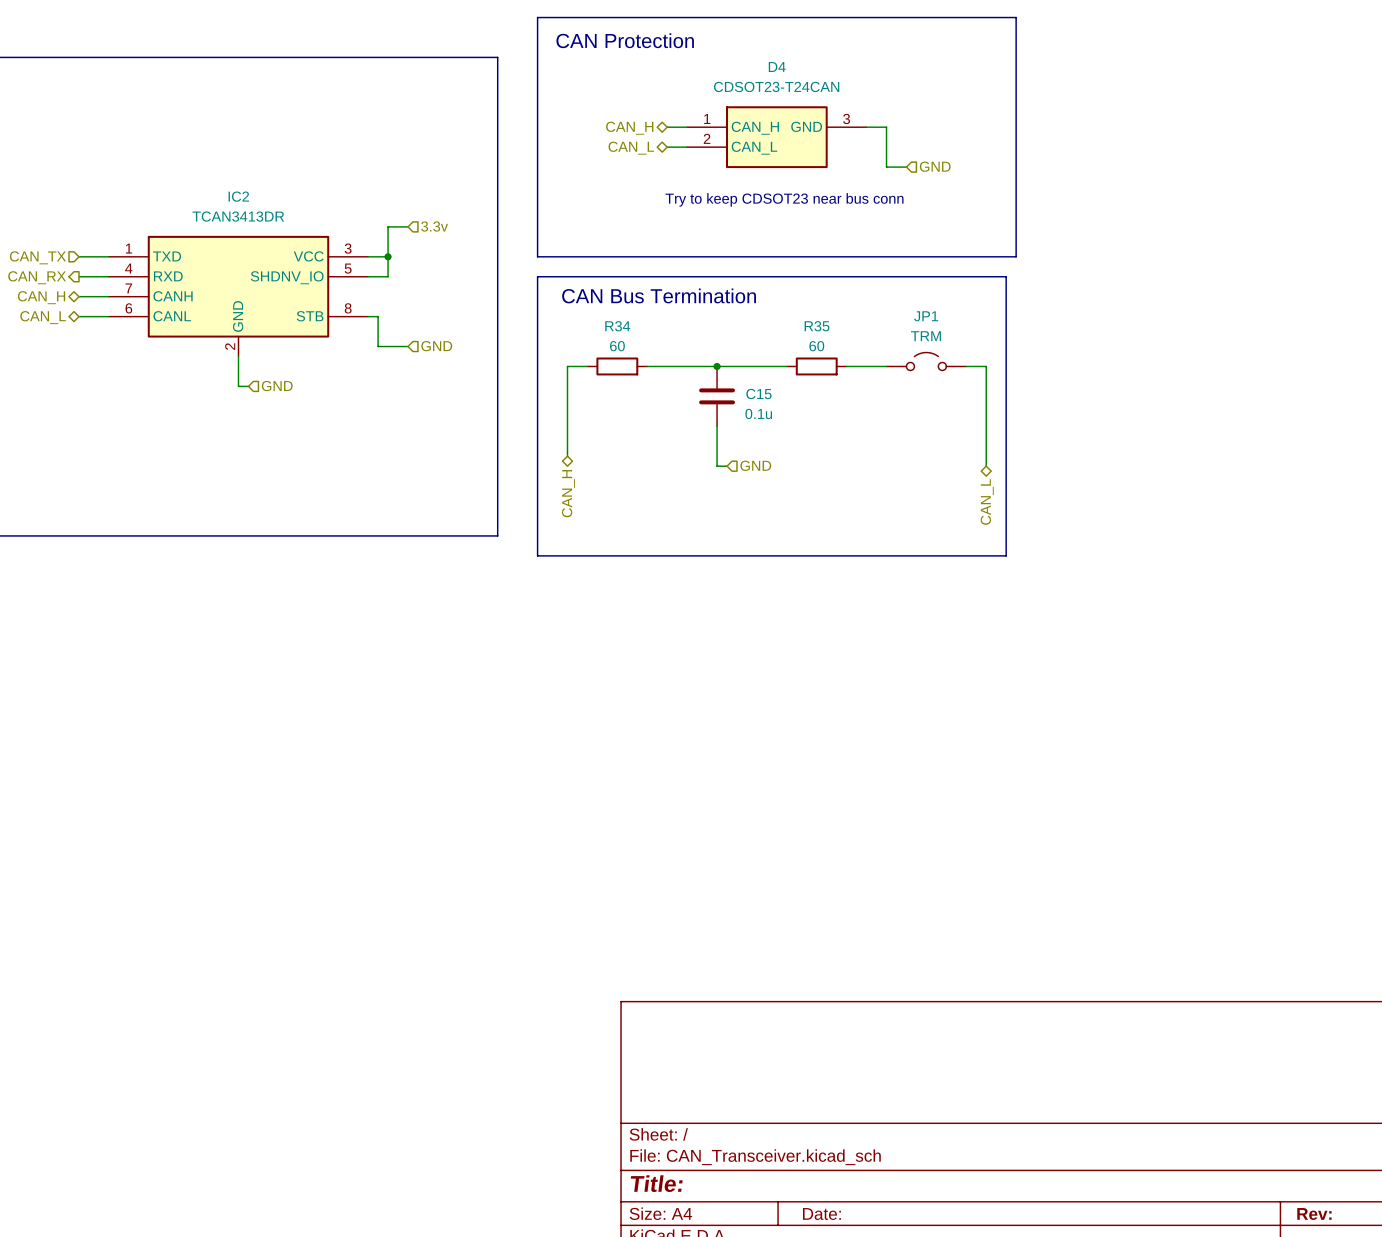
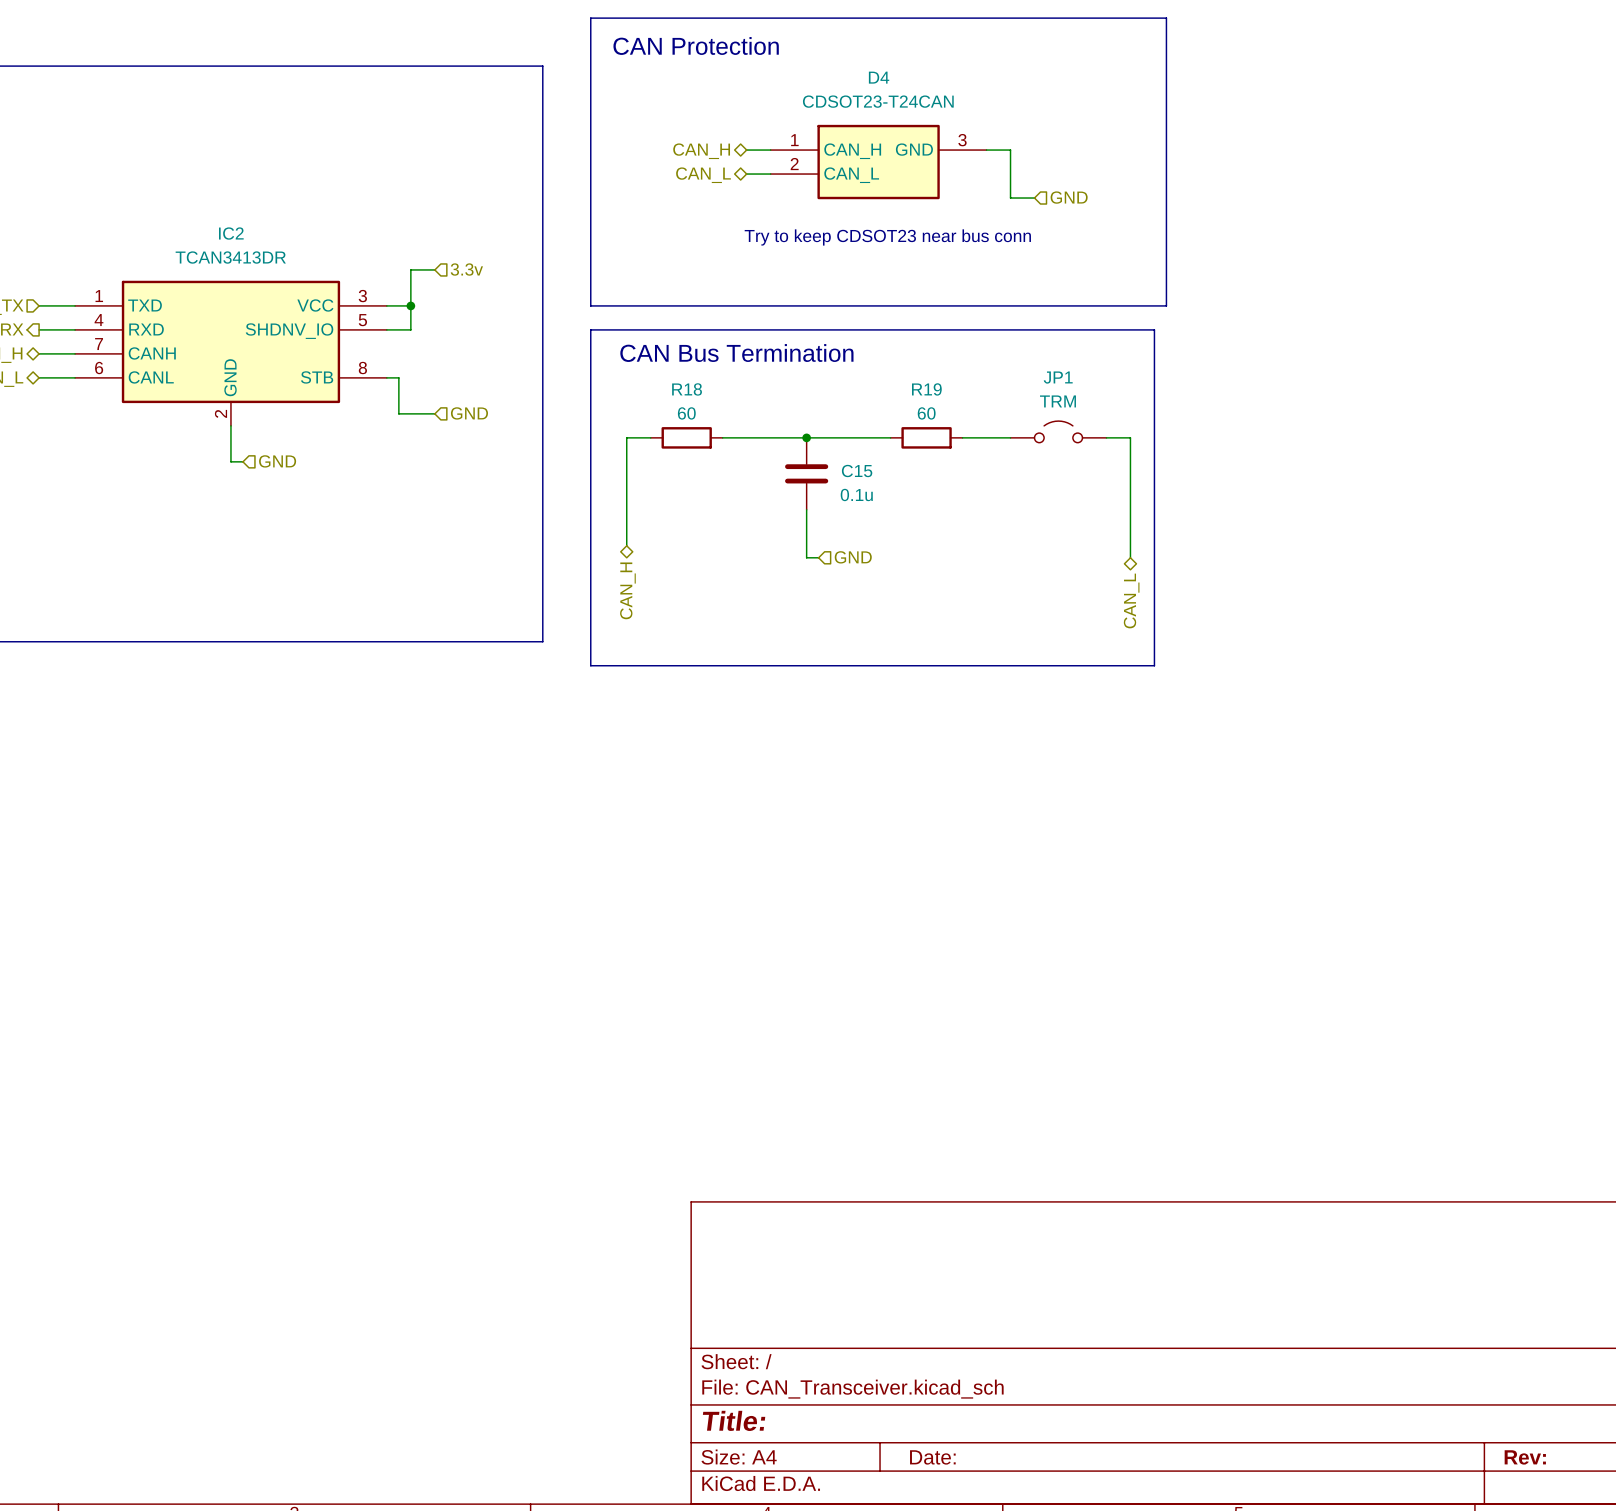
R34 name: R34 (617, 326) -> R18 (687, 389)
R35 name: R35 (817, 326) -> R19 (926, 389)

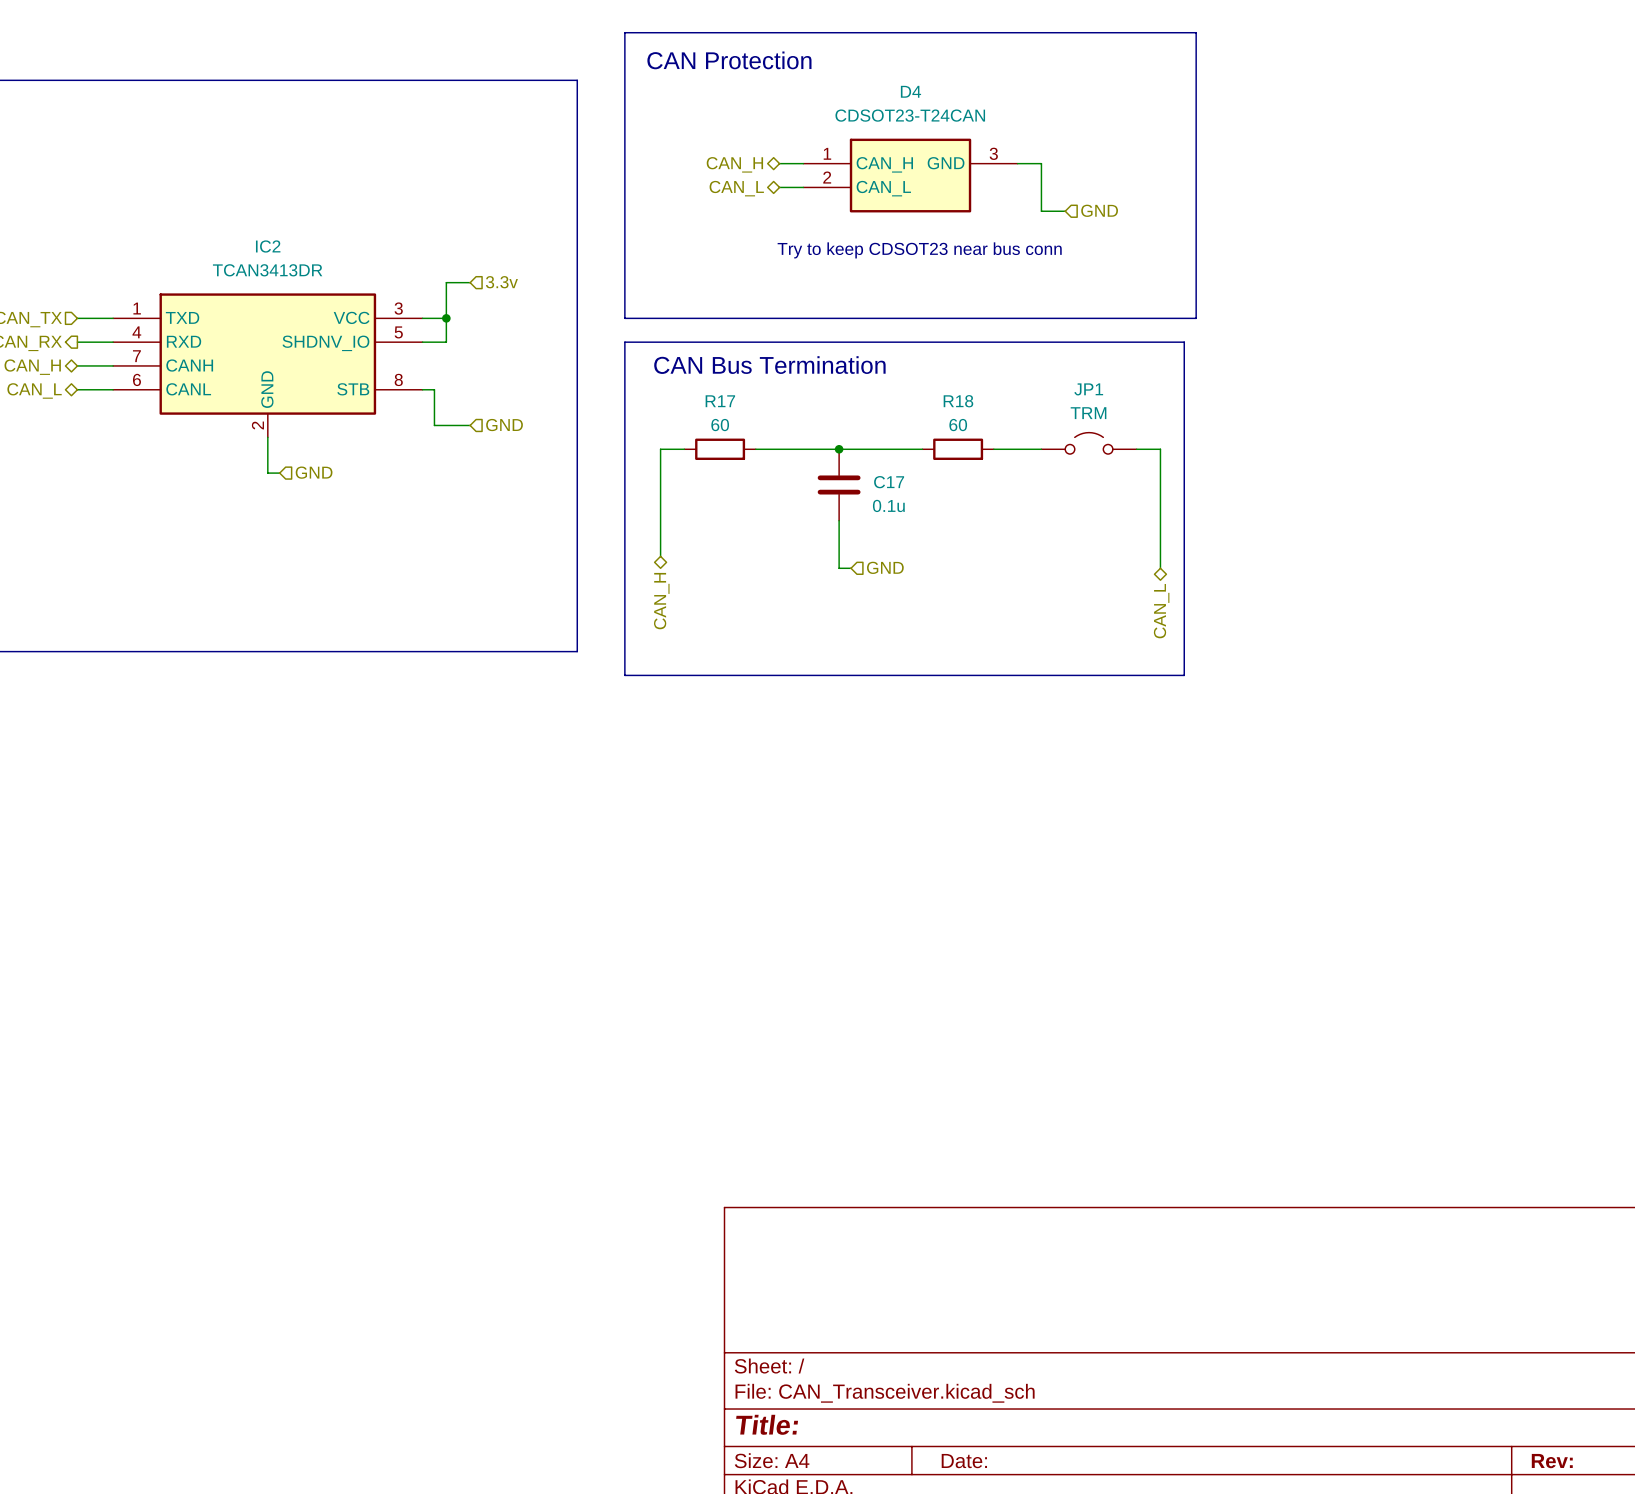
R18 name: R18 (687, 389) -> R17 (720, 401)
R19 name: R19 (926, 389) -> R18 (958, 401)
C15 name: C15 (857, 471) -> C17 (889, 482)

